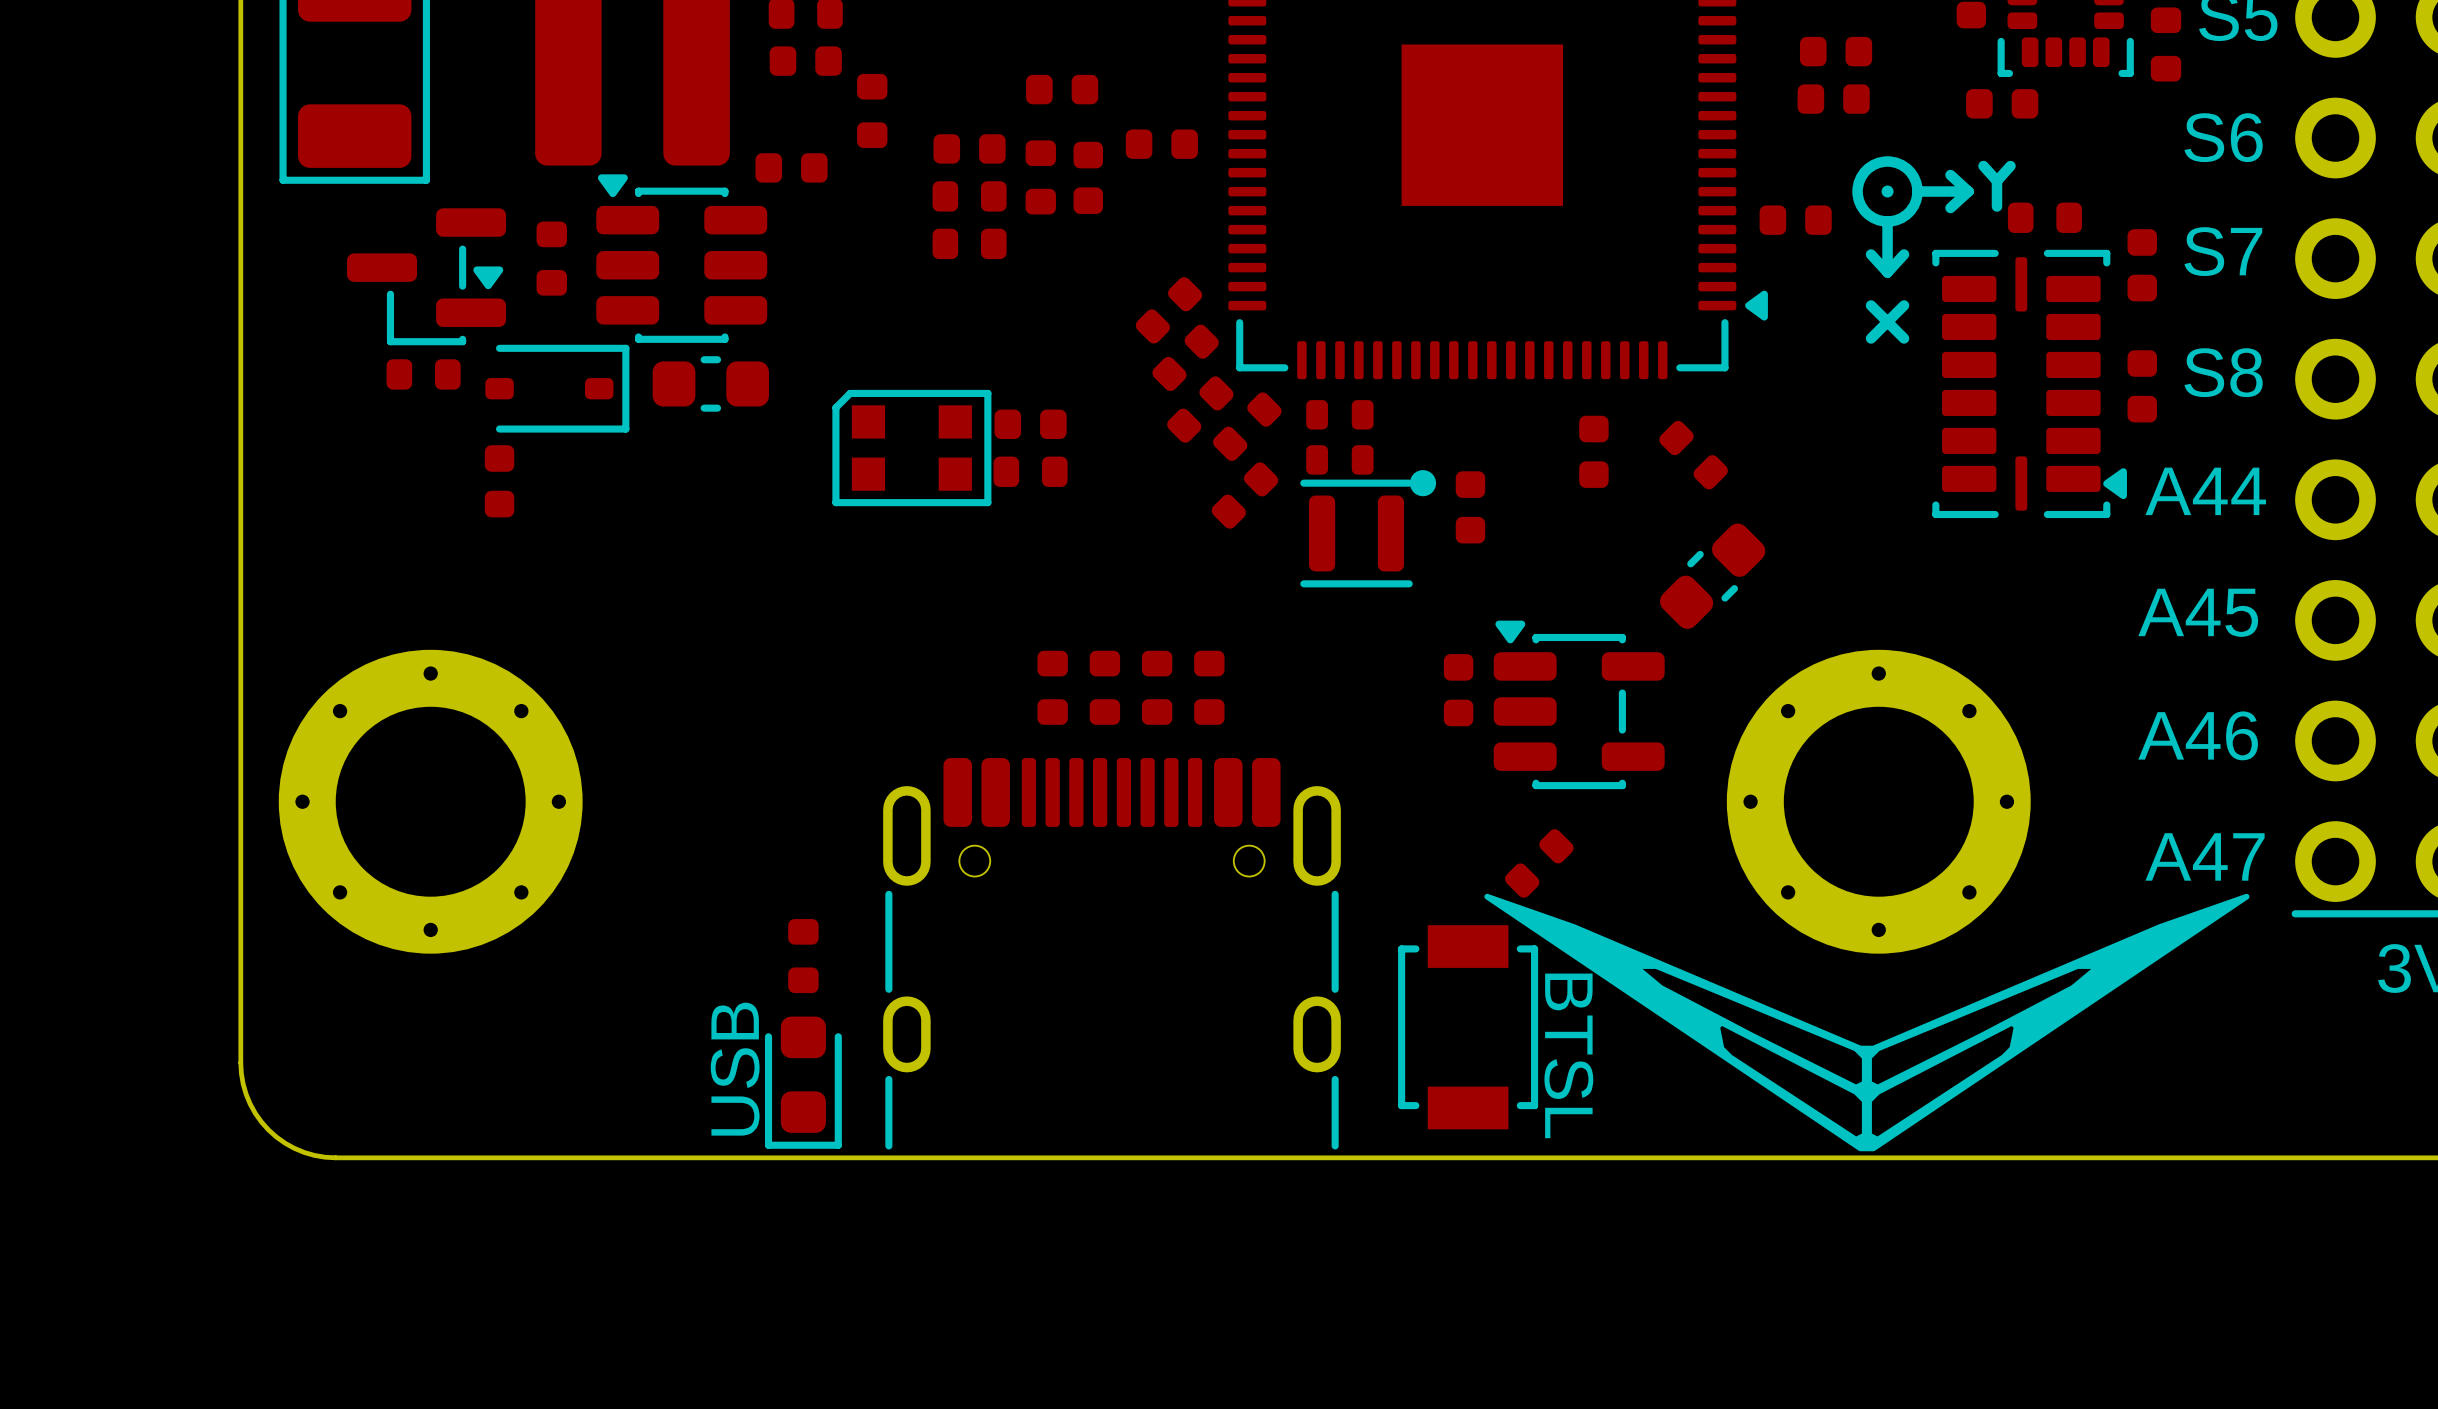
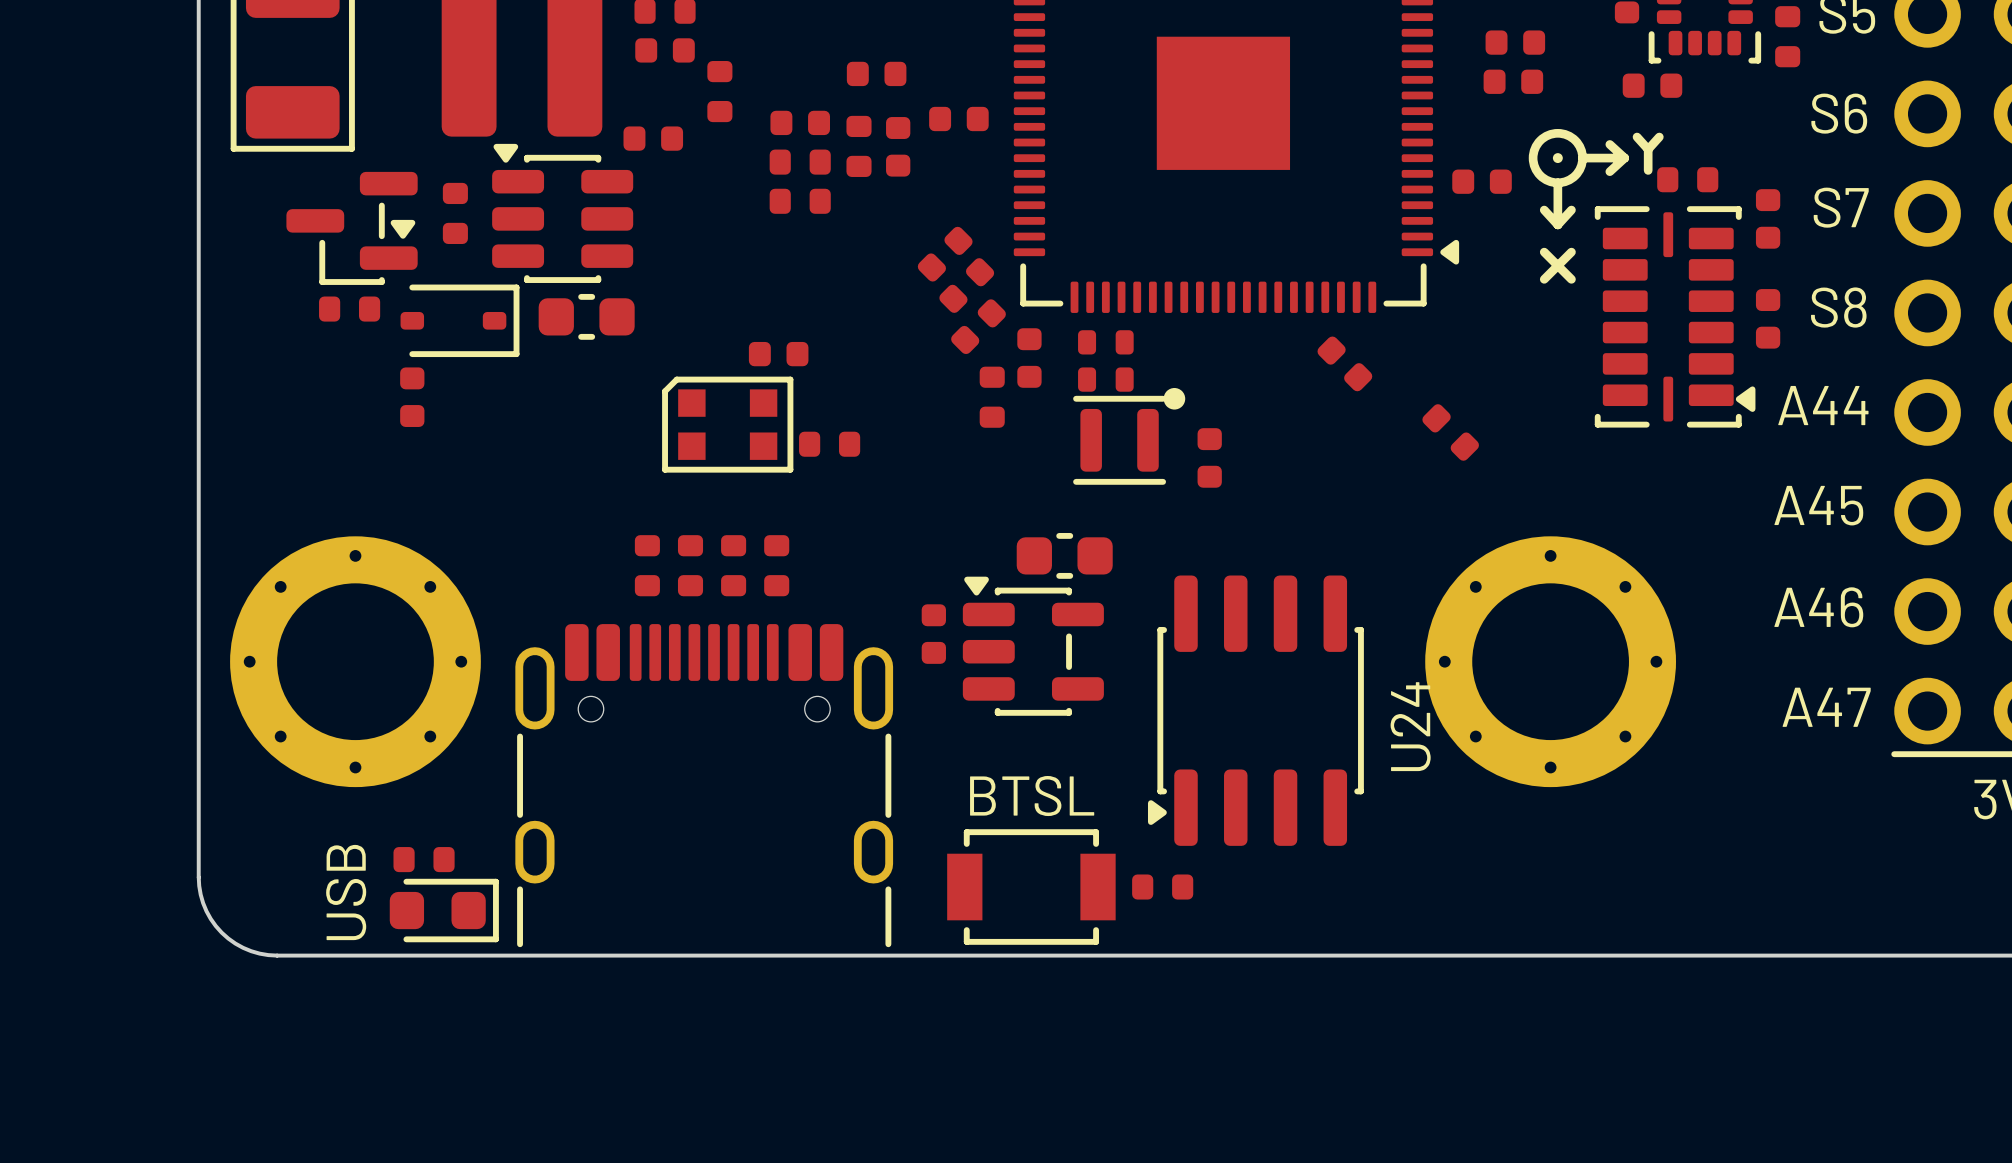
part: none -> (945, 254)
part: (1168, 310) -> none
part: none -> (966, 285)
part: (1185, 357) -> none
part footprint: [1213, 392, 1282, 461] -> [1017, 328, 1042, 388]
part: none -> (978, 326)
part: (1200, 409) -> none
part position: (1030, 424) -> (778, 354)
part: none -> (1344, 363)
part position: (911, 448) -> (727, 424)
part: (1593, 451) -> none
part position: (1693, 455) -> (1450, 432)
part position: (1030, 471) -> (829, 444)
part: none -> (992, 397)
part: (1244, 495) -> none
part position: (1470, 507) -> (1209, 457)
part: (1712, 576) -> none
part: none -> (1064, 555)
part: none -> (647, 565)
part: none -> (690, 565)
part: none -> (733, 565)
part: none -> (776, 565)
part: (1052, 687) -> none
part: (1104, 687) -> none
part: (1157, 687) -> none
part: (1209, 687) -> none
part: (1458, 690) -> none
part position: (1579, 704) -> (1033, 646)
part: none -> (933, 634)
U24: none -> (1255, 710)
part: (1539, 863) -> none
drawing: [1484, 893, 2250, 1152] -> none
part position: (1112, 953) -> (704, 785)
part: (803, 956) -> none
part rotation: 0° (1468, 1027) -> 90° clockwise (1031, 887)
part position: (1468, 1027) -> (1031, 887)
part: none -> (424, 859)
text rotation: 0° (1568, 1055) -> 90° counterclockwise (1032, 796)
text position: BTSL (1568, 1055) -> BTSL (1032, 796)
text position: USB (735, 1069) -> USB (346, 892)
part: none -> (1162, 887)
part rotation: 0° (803, 1082) -> 90° counterclockwise (444, 910)
part position: (803, 1082) -> (444, 910)

